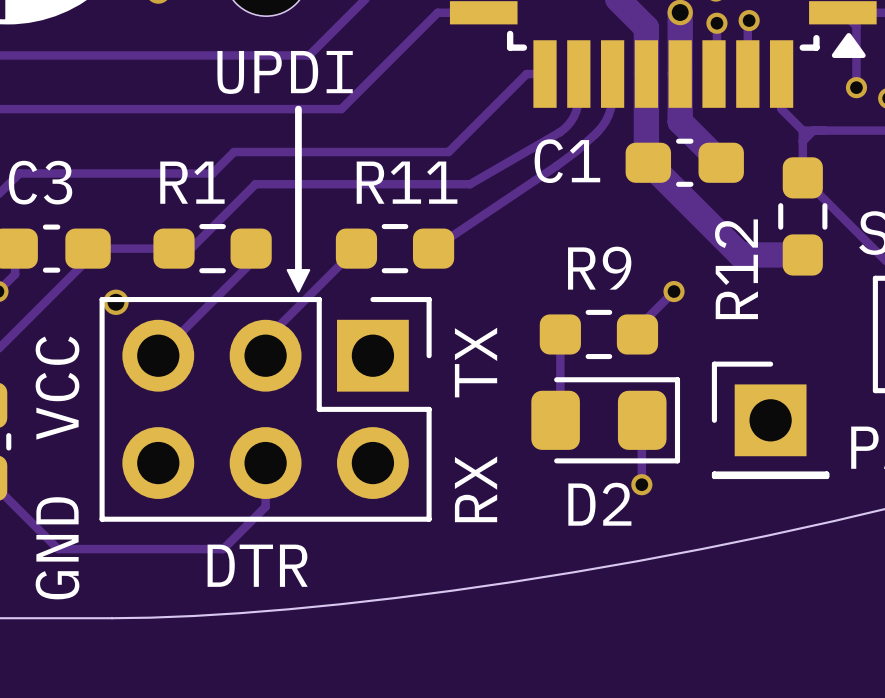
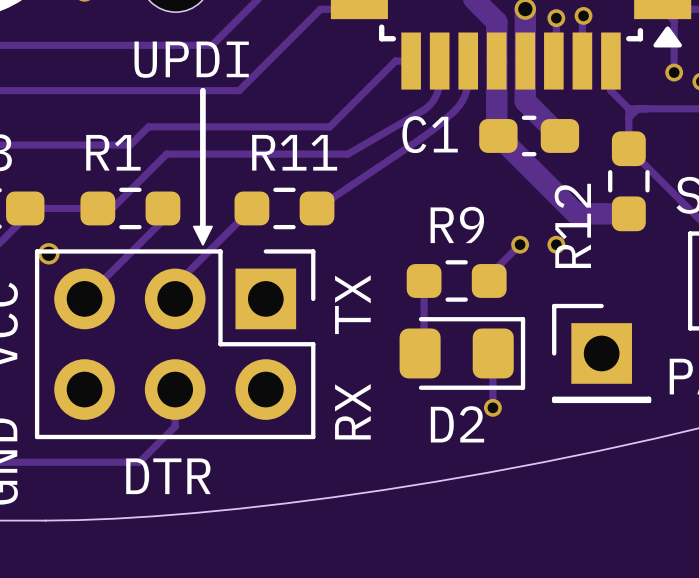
via: none -> (556, 244)

